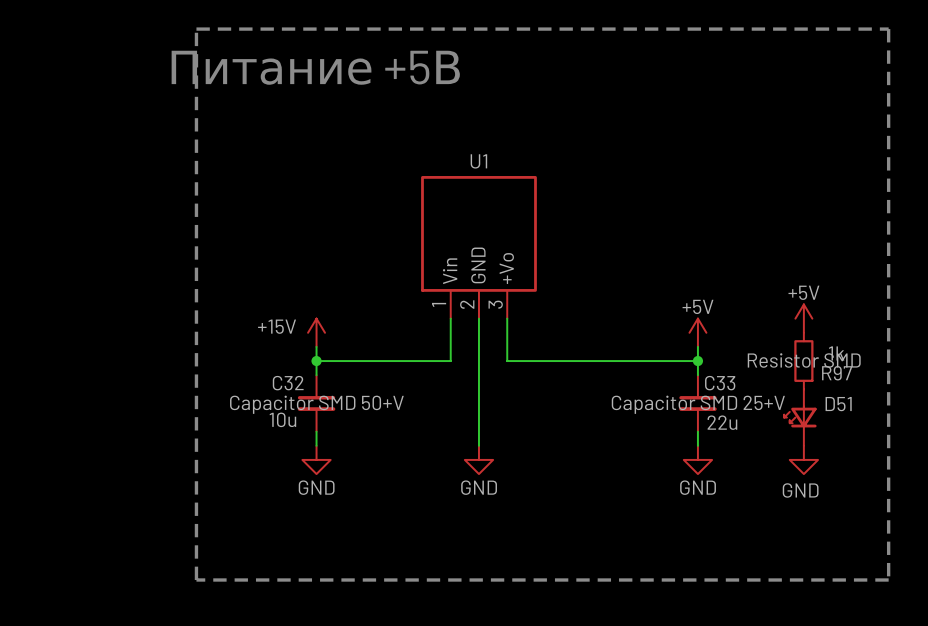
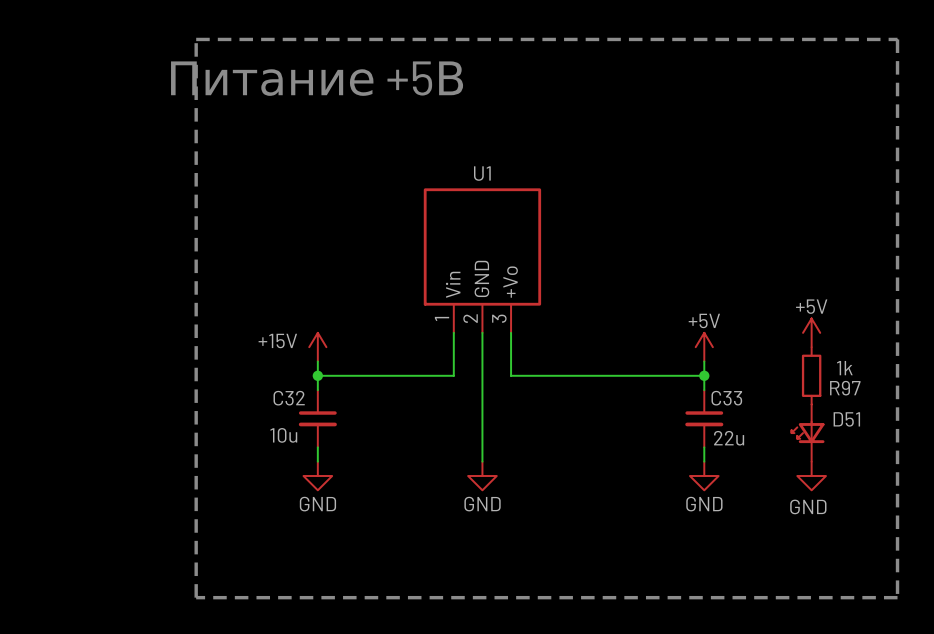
R97 text: Resistor SMD (804, 360) -> none
C32 text: Capacitor SMD 50+V (316, 404) -> none
C33 text: Capacitor SMD 25+V (698, 404) -> none

